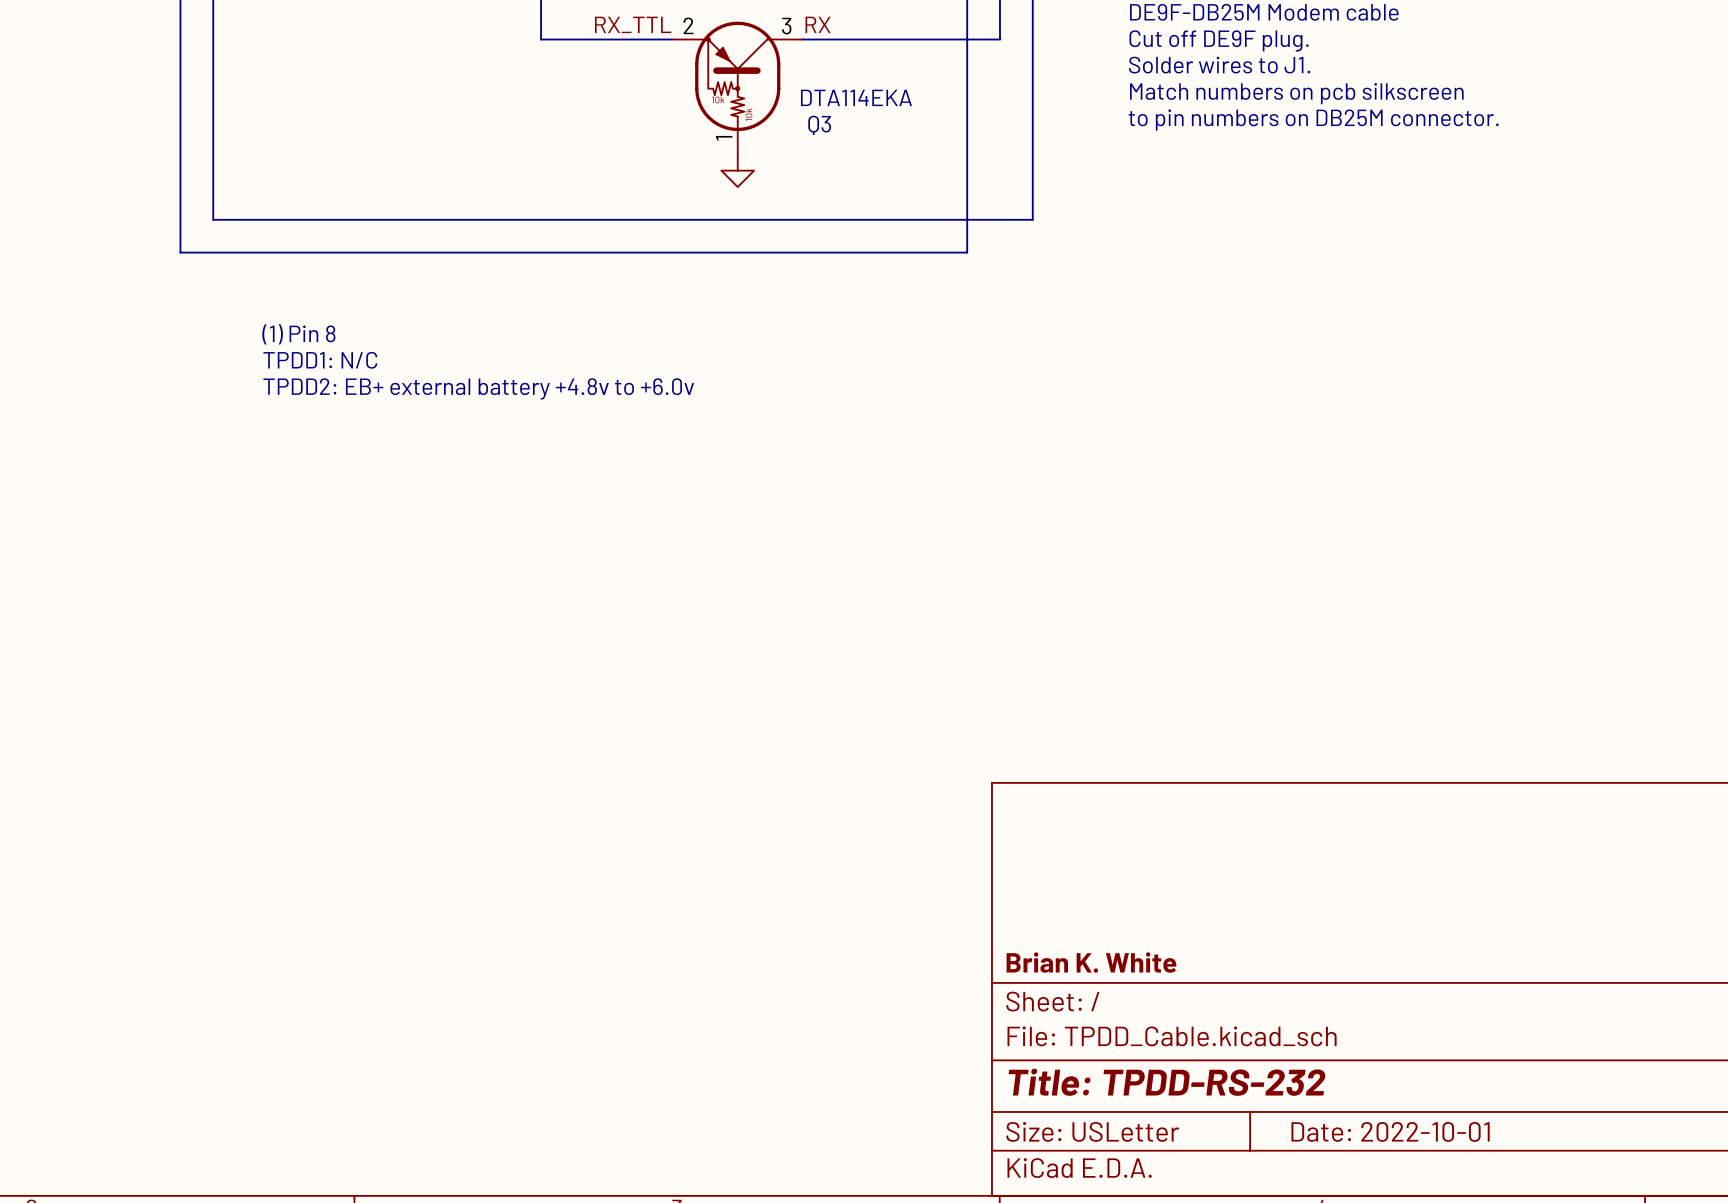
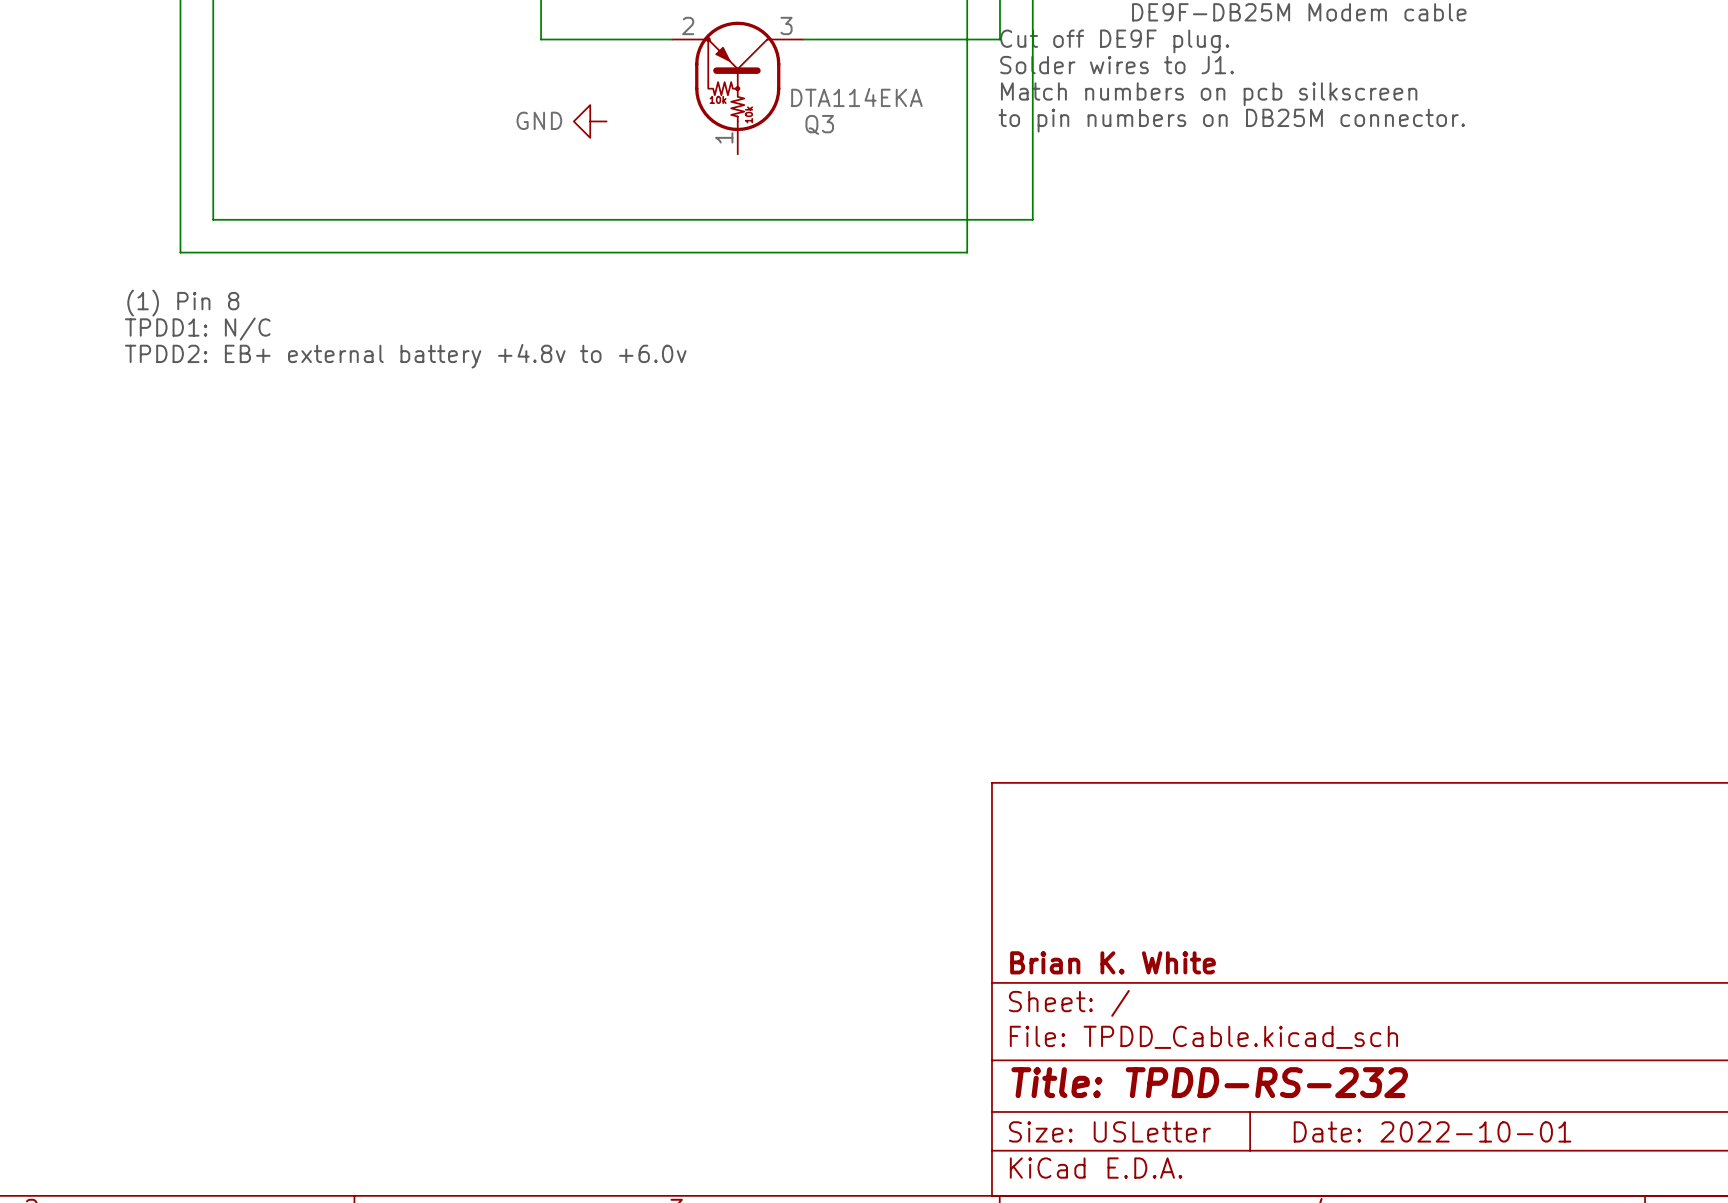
label: RX_TTL (633, 24) -> none
label: RX (818, 24) -> none
text position: Cut off DE9F plug. (1219, 40) -> Cut off DE9F plug. (1114, 41)
text position: Solder wires to J1. (1219, 65) -> Solder wires to J1. (1117, 65)
text position: Match numbers on pcb silkscreen (1296, 93) -> Match numbers on pcb silkscreen (1209, 94)
text position: to pin numbers on DB25M connector. (1313, 120) -> to pin numbers on DB25M connector. (1231, 120)
power symbol: none -> GND (590, 121)
power symbol: (737, 170) -> none
text position: (1) Pin 8 (298, 334) -> (1) Pin 8 (183, 303)
text position: TPDD1: N/C (320, 360) -> TPDD1: N/C (197, 329)
text position: TPDD2: EB+ external battery +4.8v to +6.0v (478, 388) -> TPDD2: EB+ external battery +4.8v to +6.0v (405, 356)

